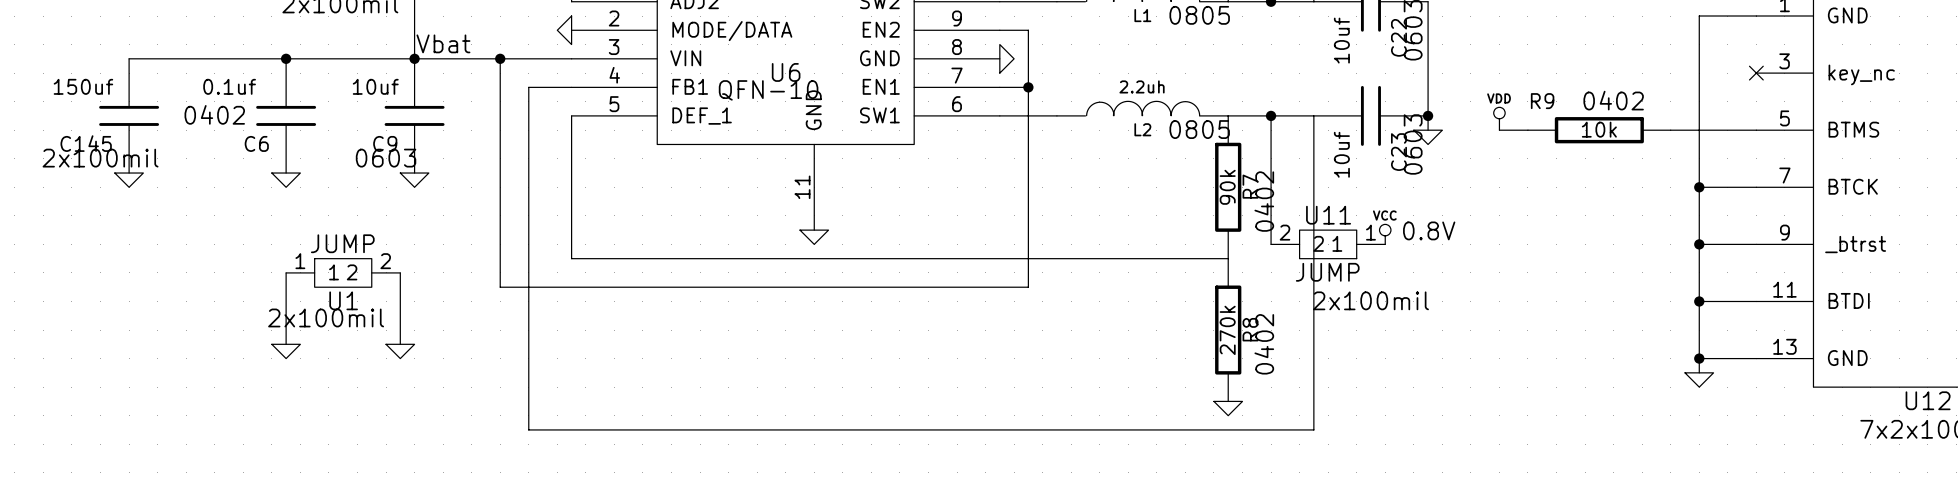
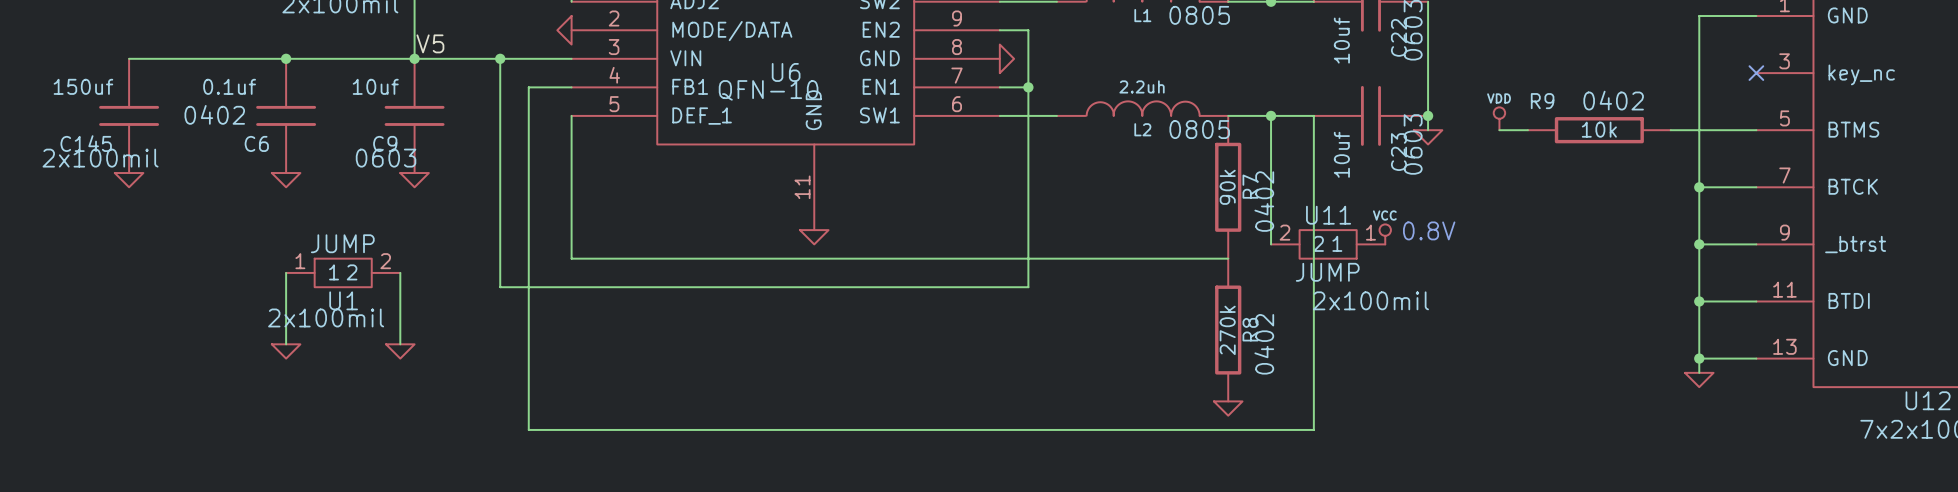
label: Vbat (443, 43) -> V5 (430, 43)

